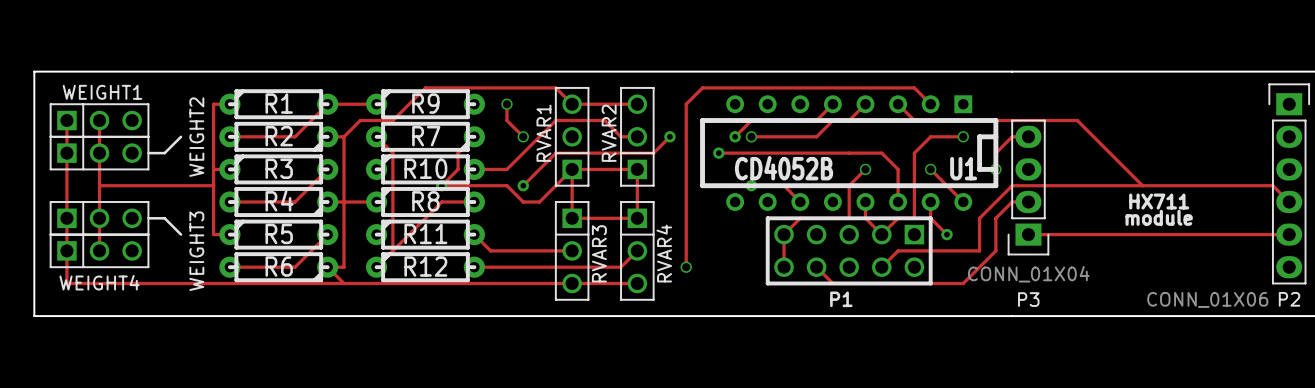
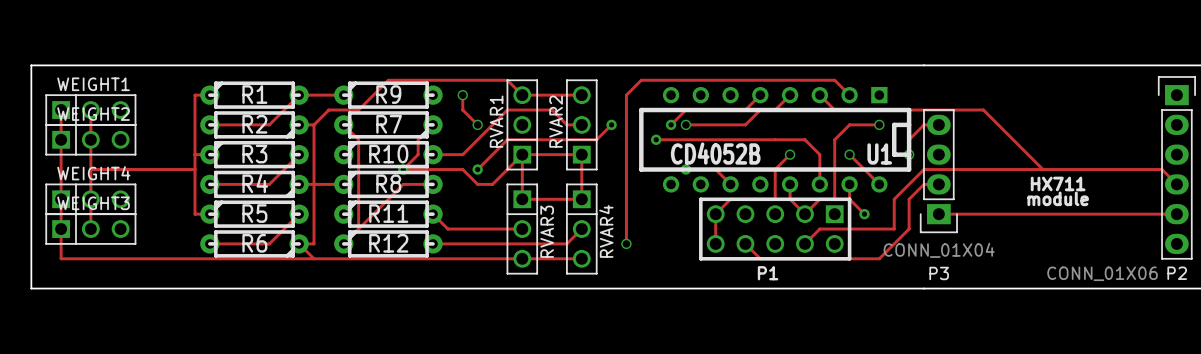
line: (181, 136) (164, 153) (148, 153) -> none
WEIGHT2 name rotation: 0° (196, 137) -> 90° clockwise (93, 114)
line: (148, 218) (164, 218) (181, 234) -> none
WEIGHT3 name: WEIGHT3 (196, 251) -> WEIGHT4 (93, 173)
WEIGHT4 name: WEIGHT4 (99, 282) -> WEIGHT3 (93, 203)

